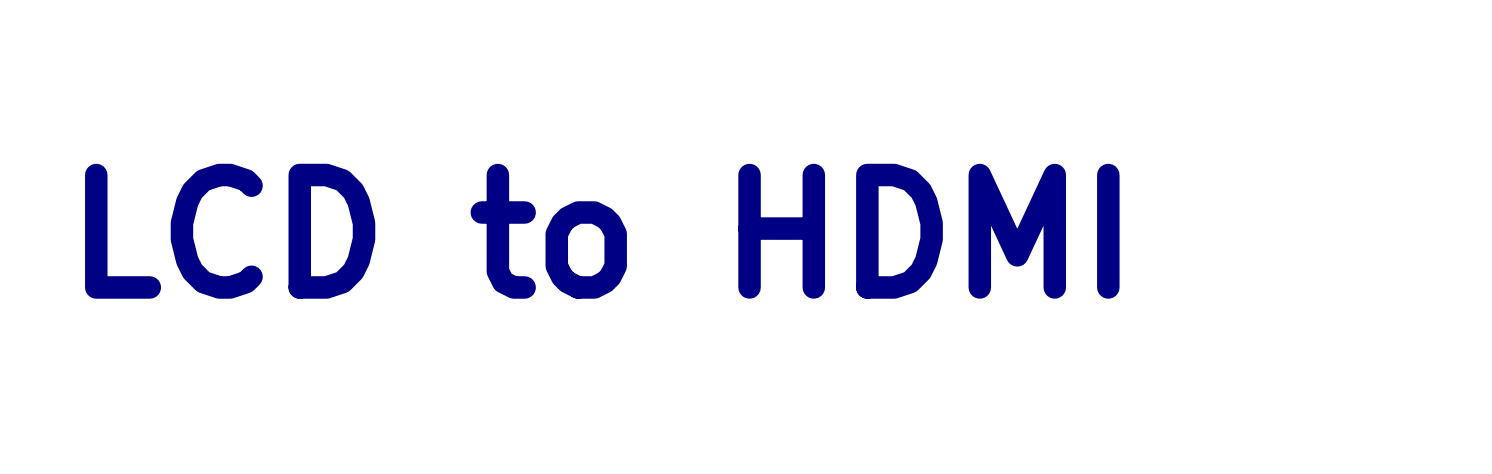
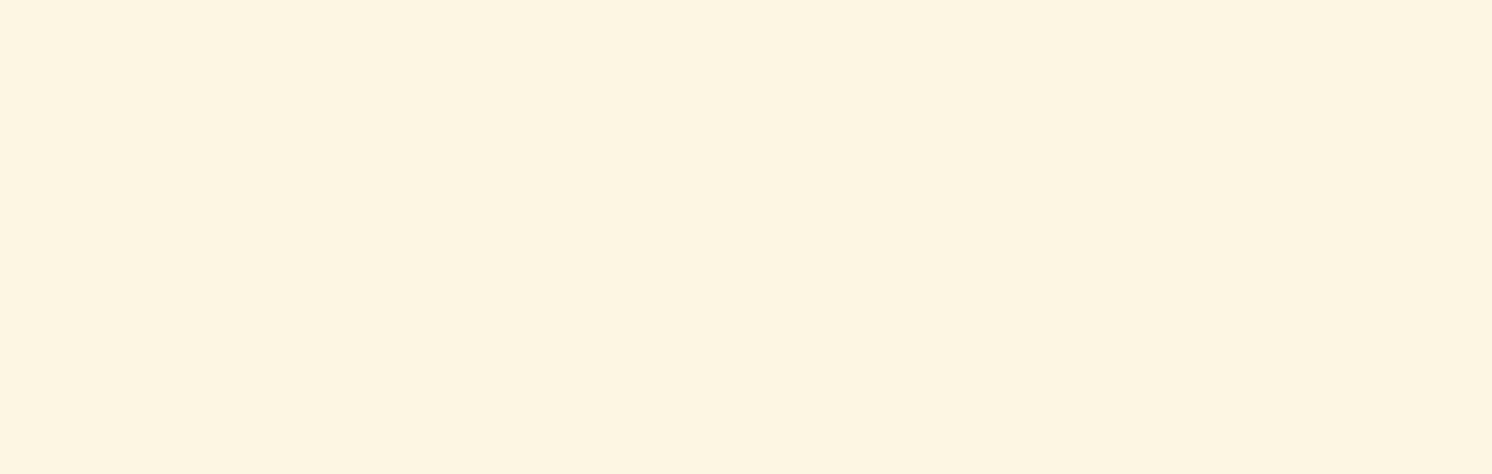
text: LCD to HDMI (602, 231) -> none

